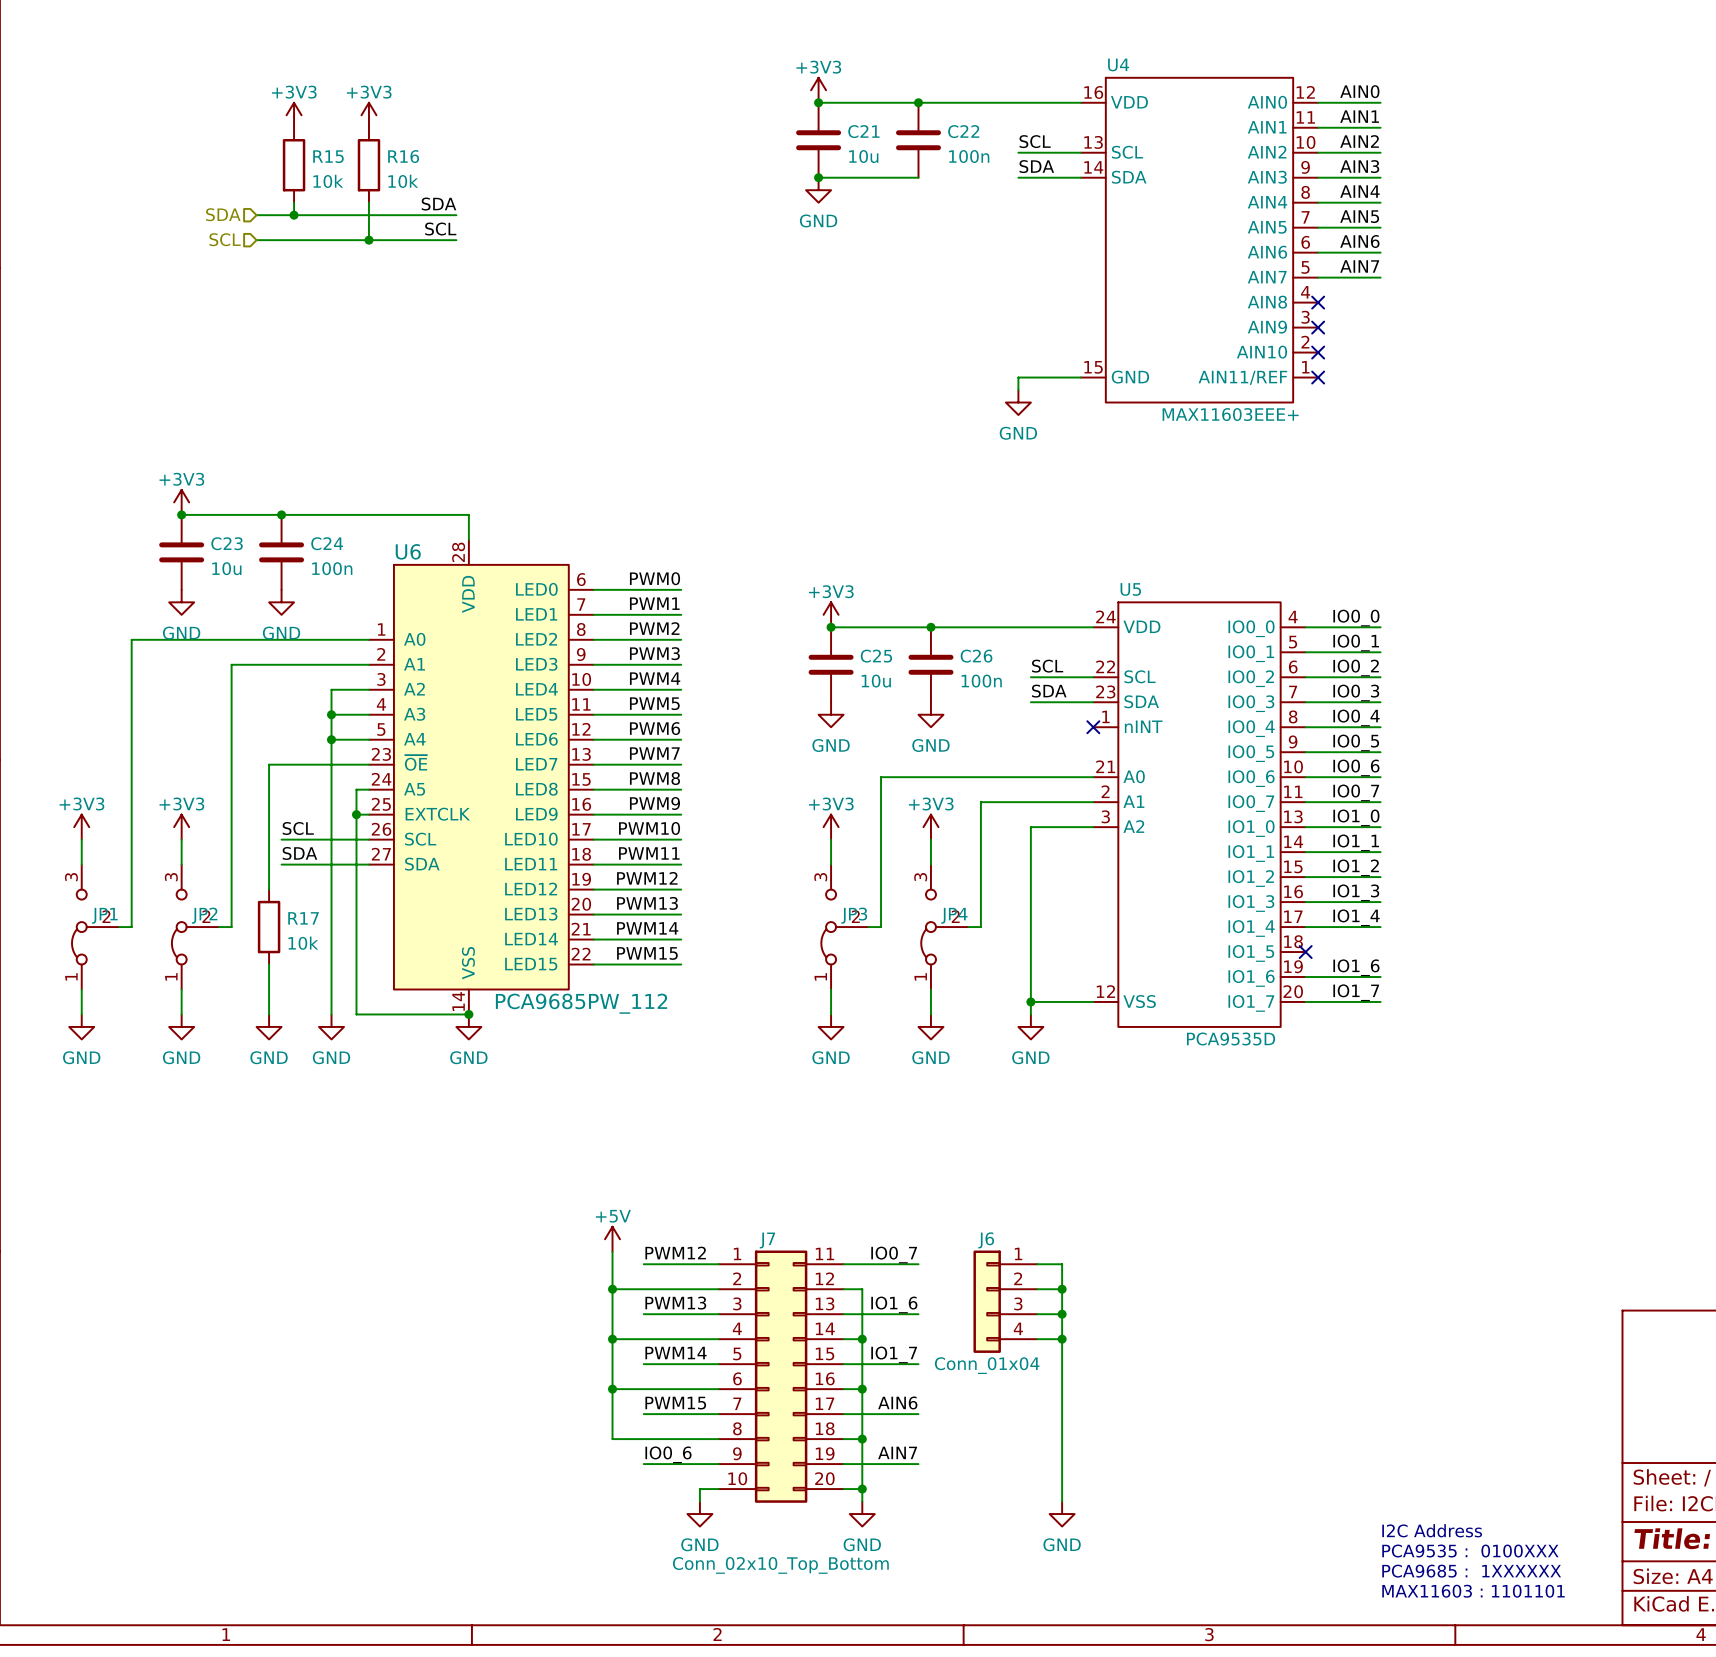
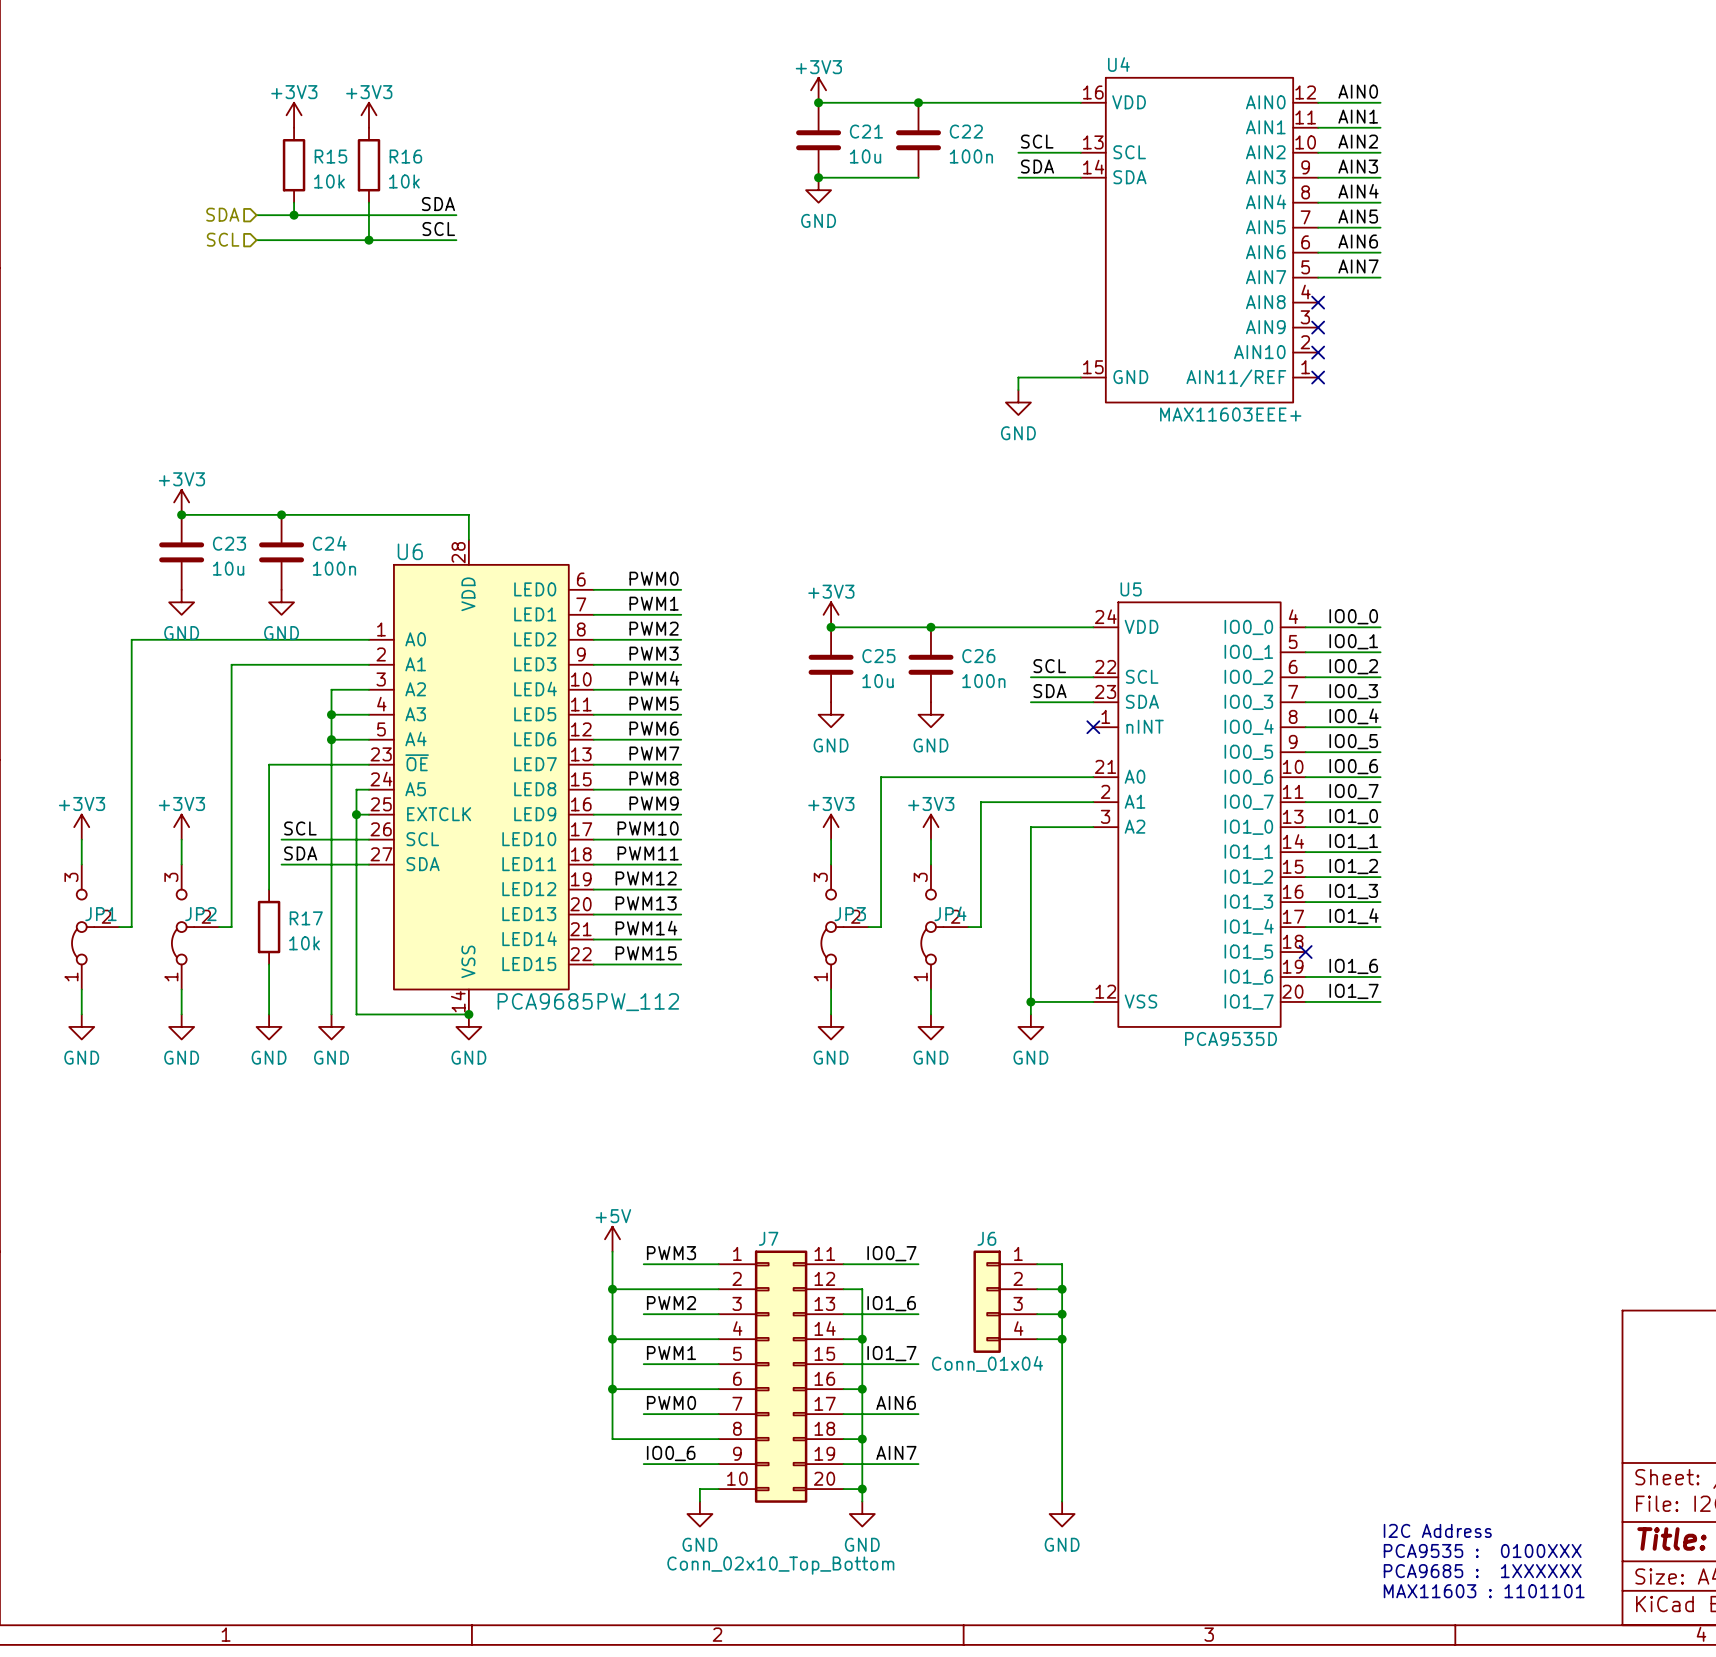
label: PWM12 (675, 1252) -> PWM3 (671, 1253)
label: PWM13 (675, 1303) -> PWM2 (671, 1303)
label: PWM14 (676, 1353) -> PWM1 (671, 1353)
label: PWM15 (675, 1403) -> PWM0 (671, 1402)

